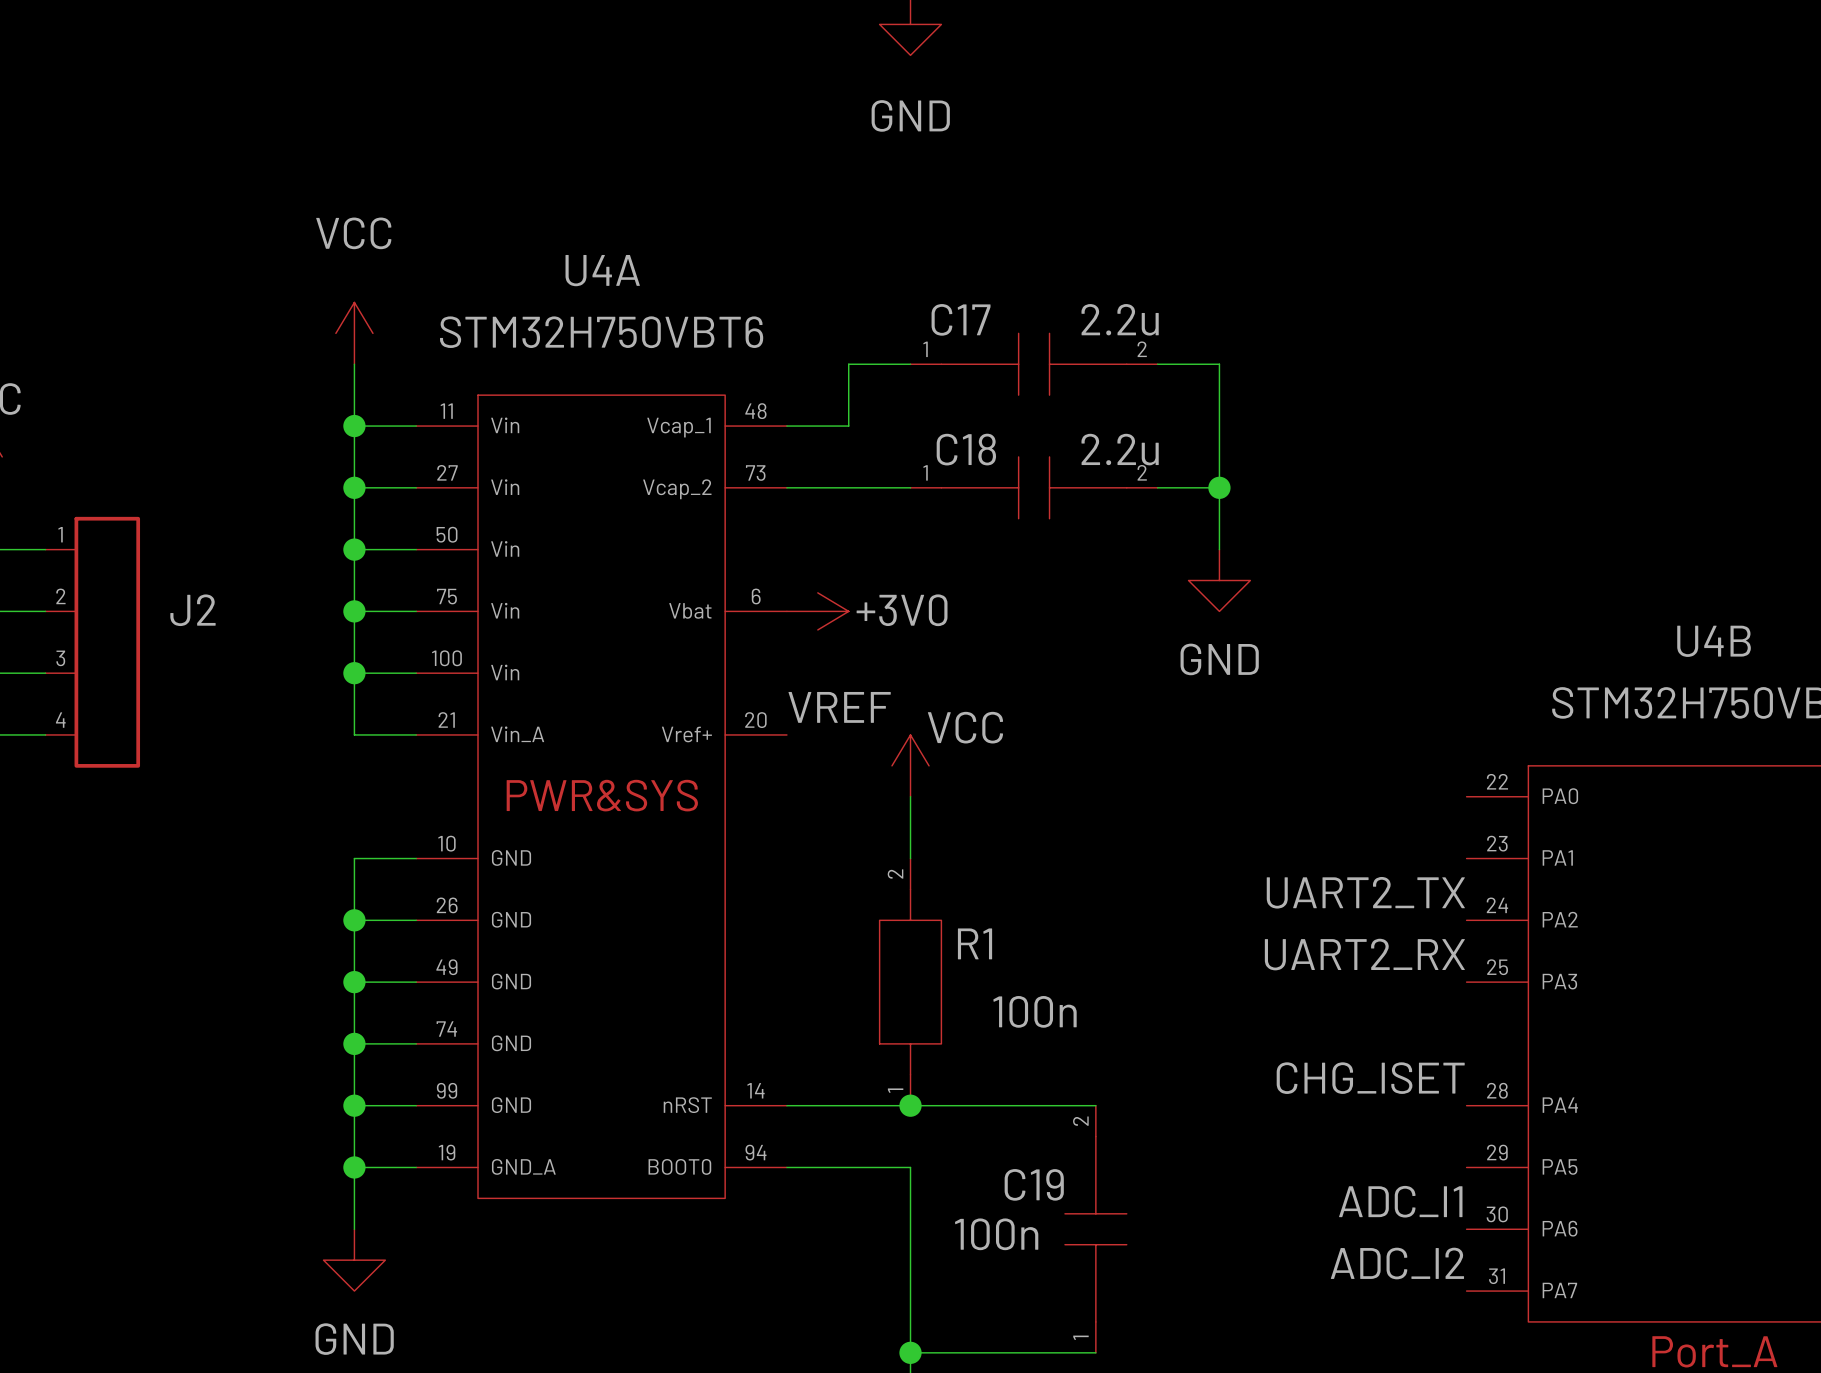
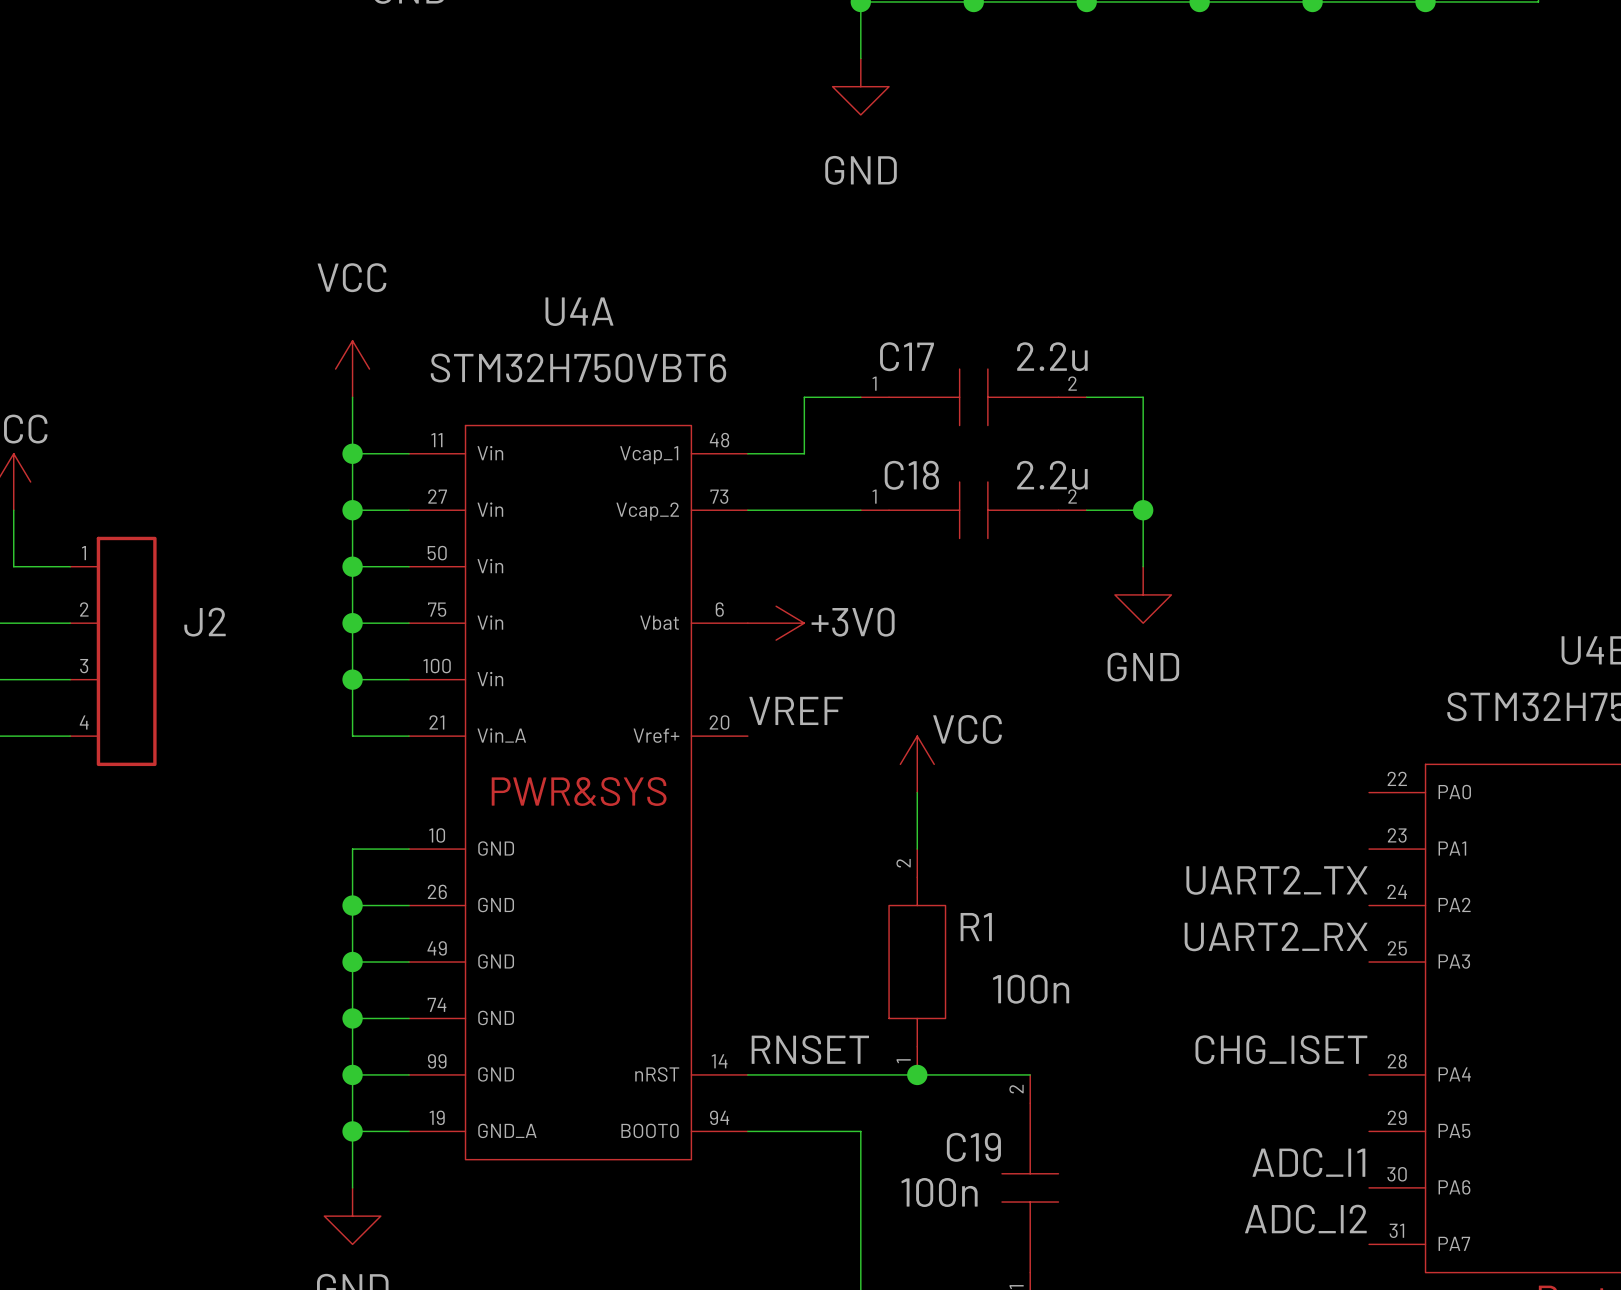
power symbol position: VCC (910, 765) -> VCC (917, 764)
wire: (910, 796) (910, 858) -> (917, 792) (917, 849)
R1 position: (910, 982) -> (917, 962)
label: none -> RNSET (810, 1049)
junction position: (910, 1105) -> (917, 1074)

